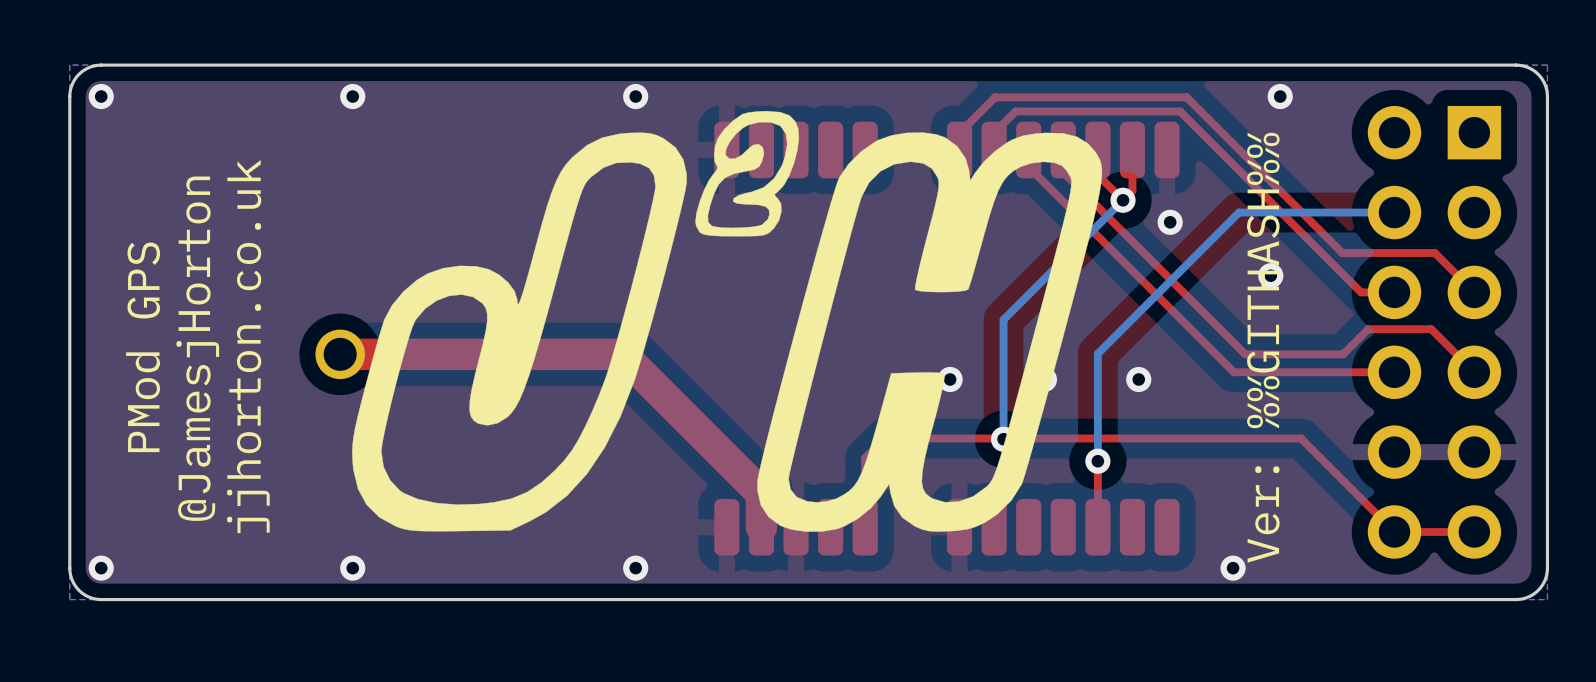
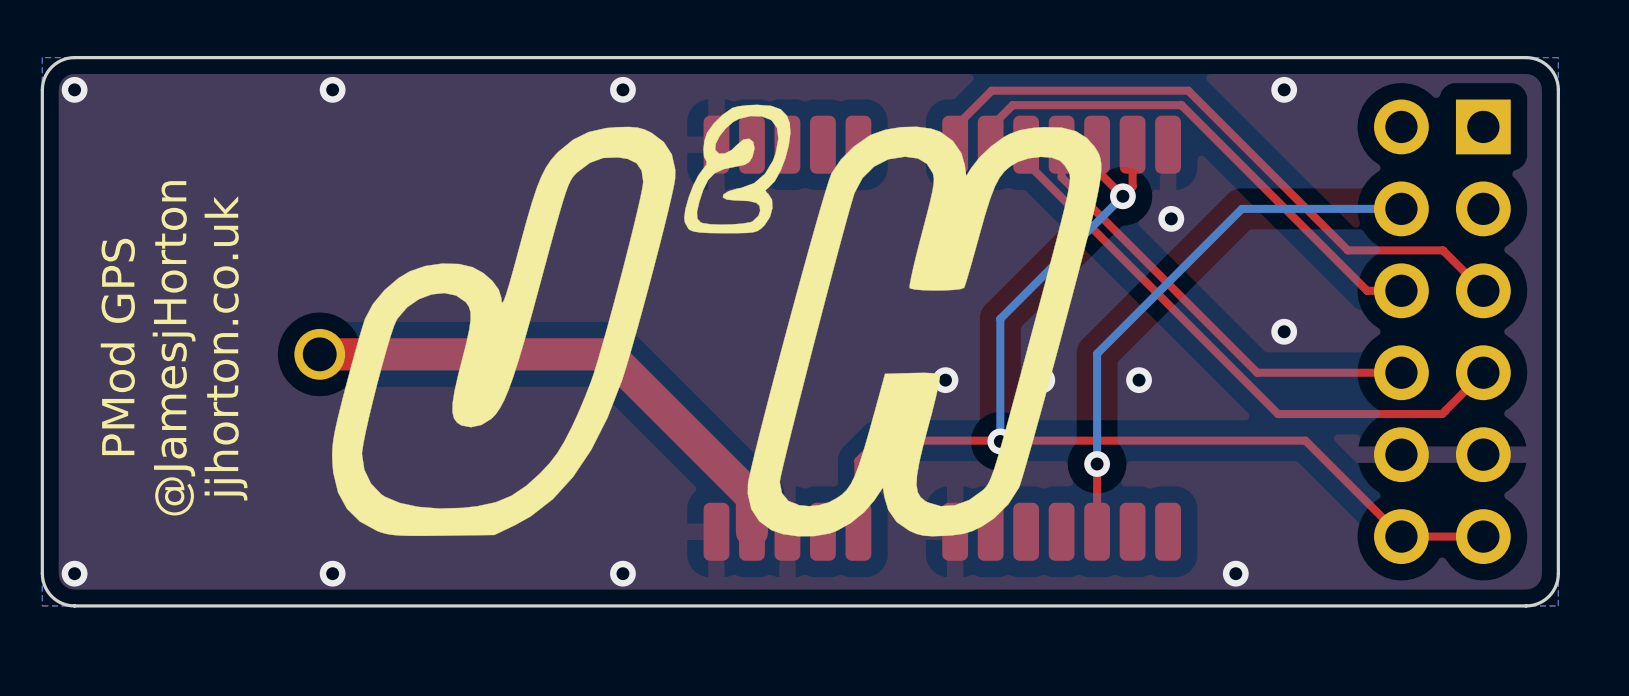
top track: (1063, 172) (1245, 354) (1343, 354) (1368, 329) (1431, 329) (1474, 372) -> (1061, 167) (1061, 177) (1257, 372)
via position: (1270, 275) -> (1284, 331)
text: Ver: %%GITHASH%% (1263, 347) -> none
top track: (1253, 372) (1233, 372) -> (1483, 372) (1442, 414) (1277, 414) (1236, 372)

